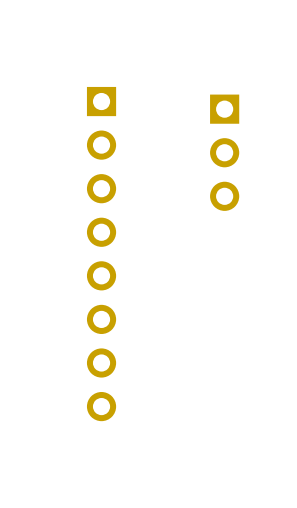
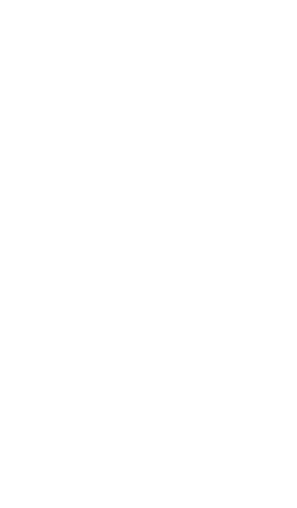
part: (224, 152) -> none
part: (101, 254) -> none

